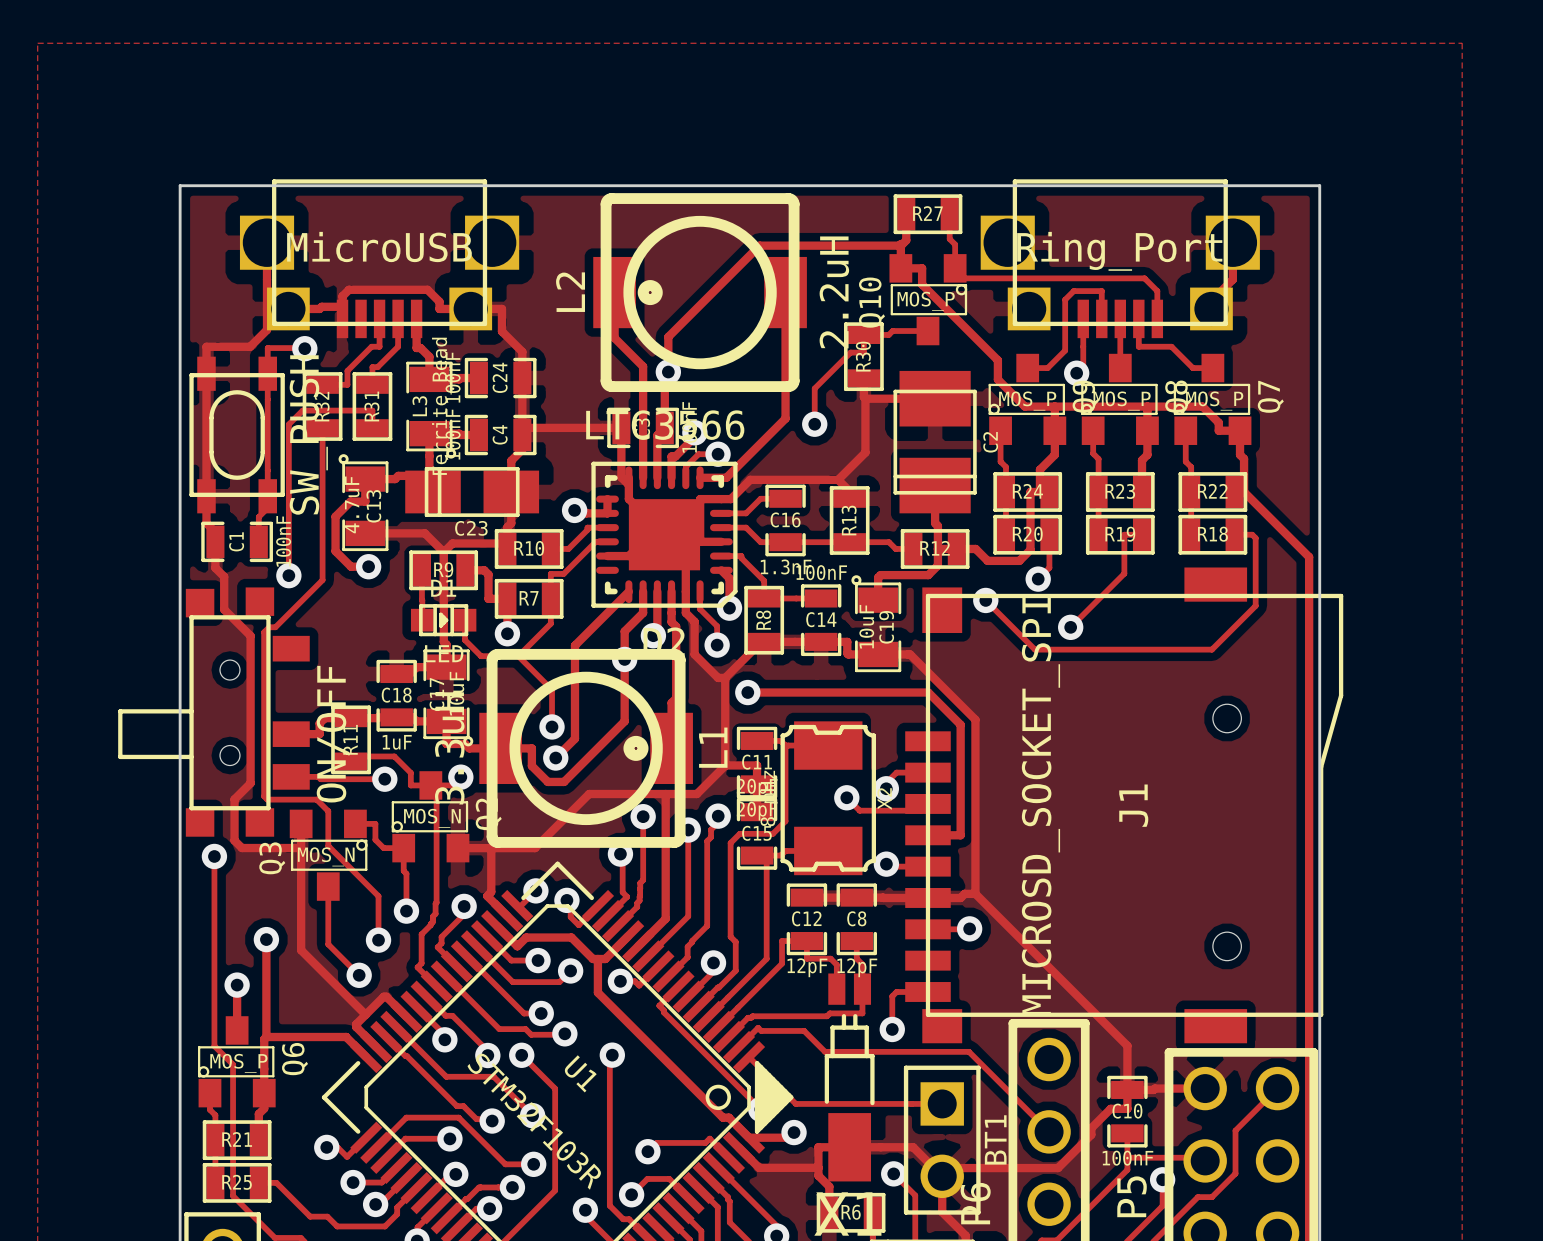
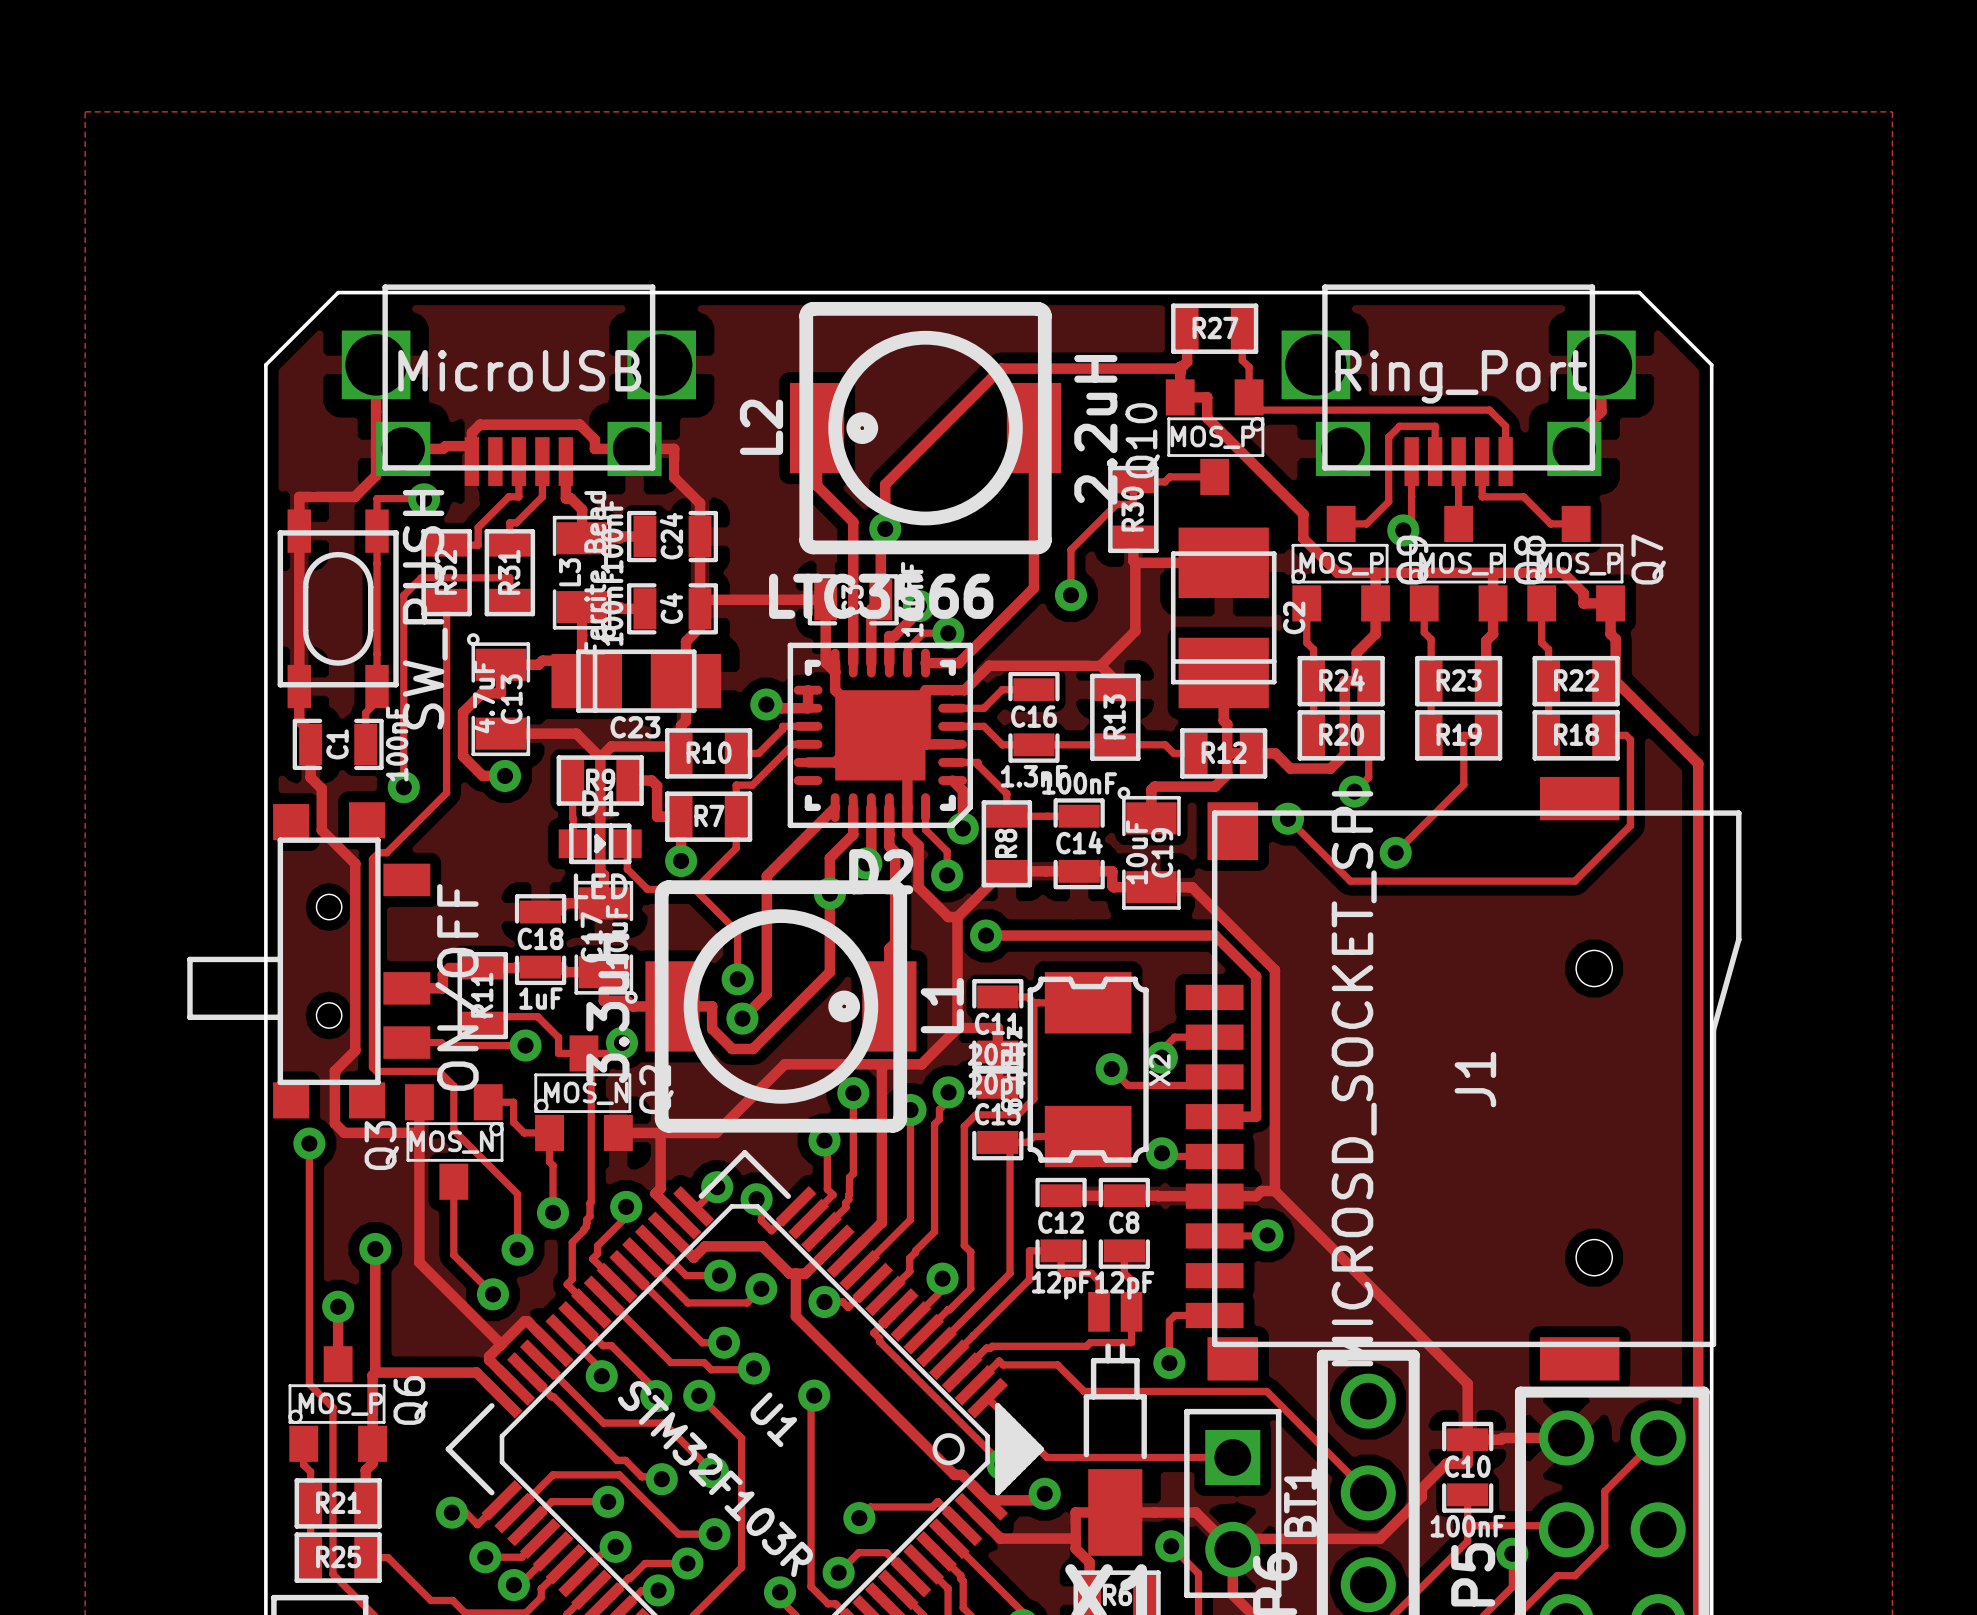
board edge: (237, 185) (180, 185) (180, 242) -> (338, 292) (265, 364)
board edge: (1262, 185) (1319, 185) (1319, 242) -> (1639, 292) (1711, 364)

